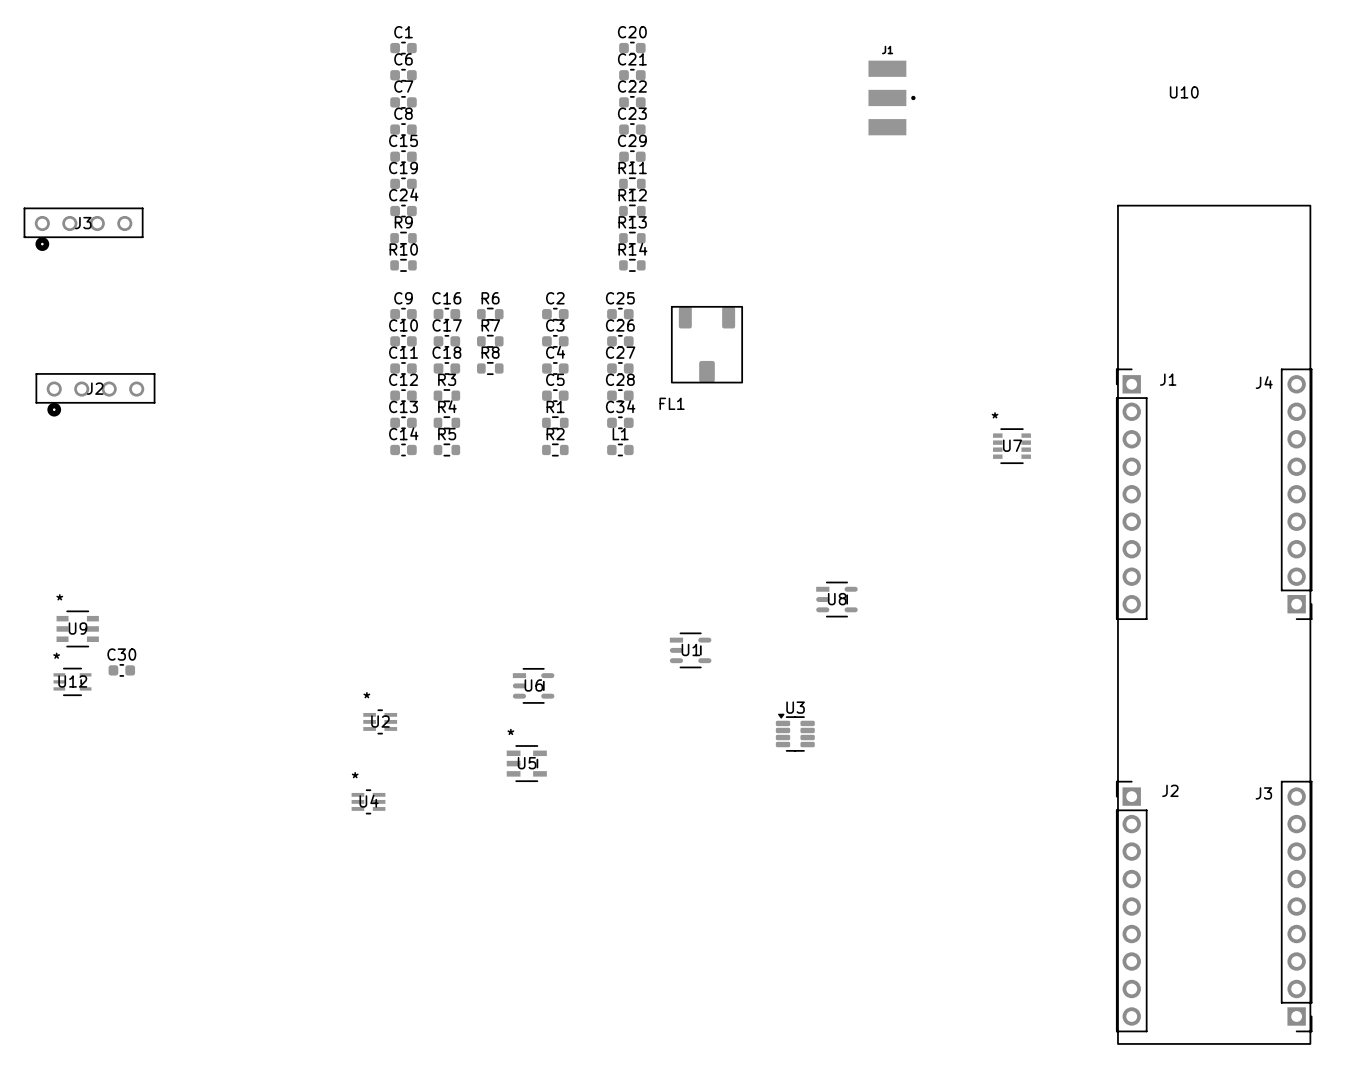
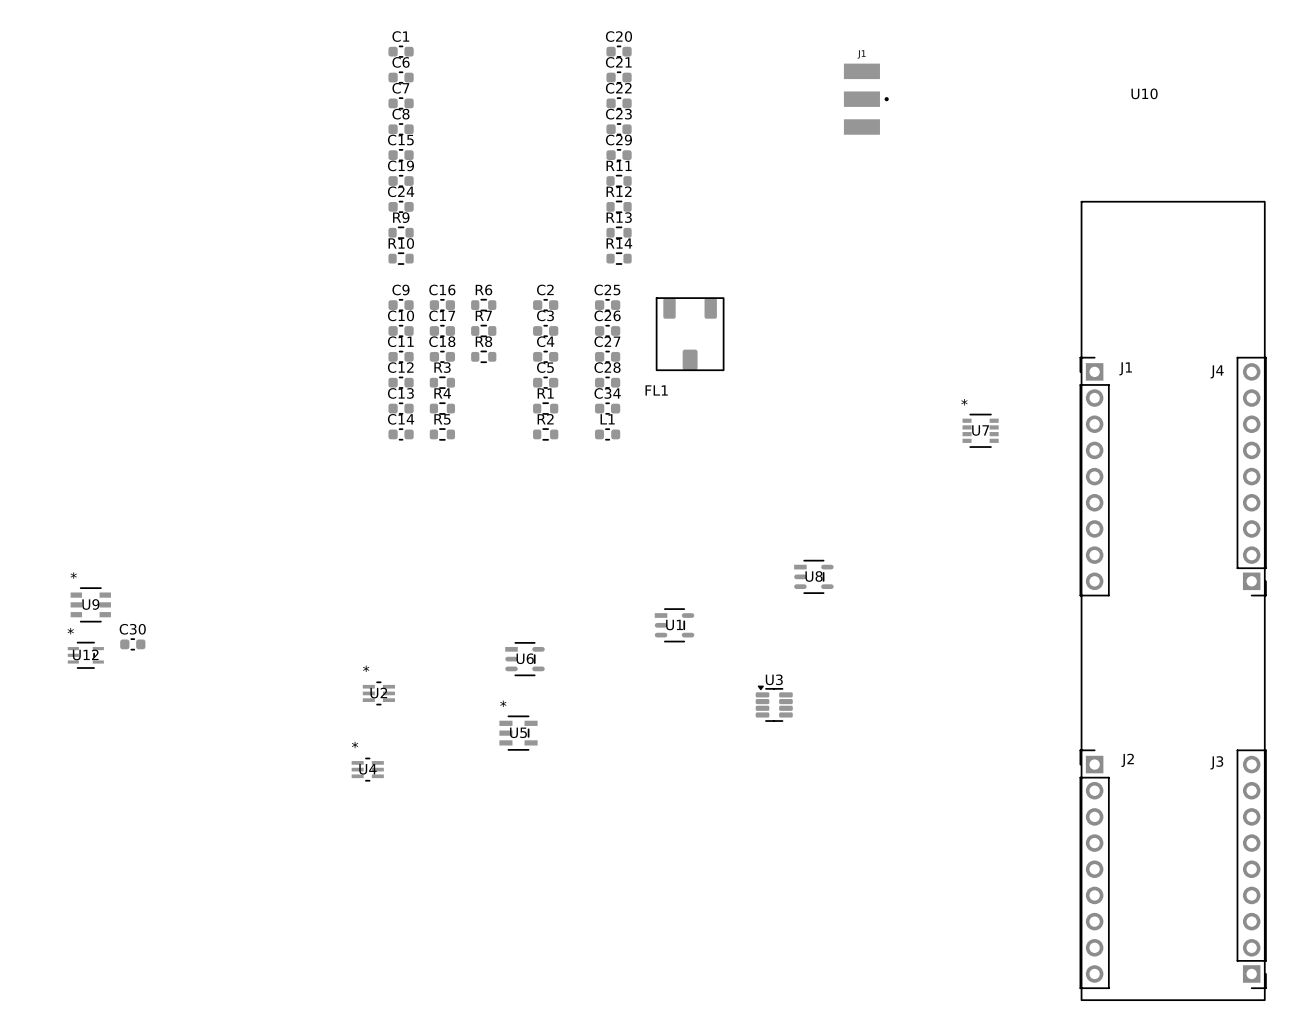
J3: (83, 229) -> none
J2: (95, 394) -> none

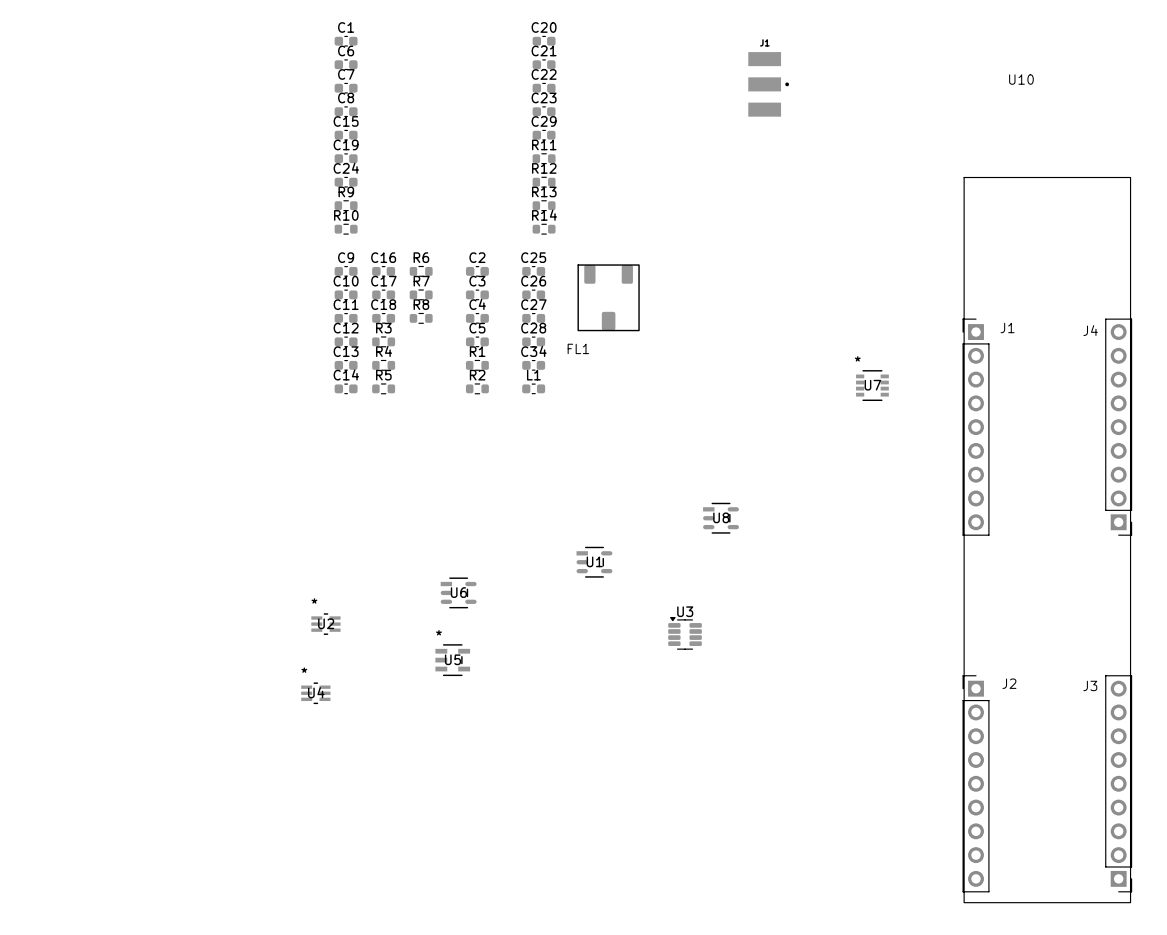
U9: (90, 604) -> none
C30: (132, 644) -> none
U12: (85, 655) -> none

